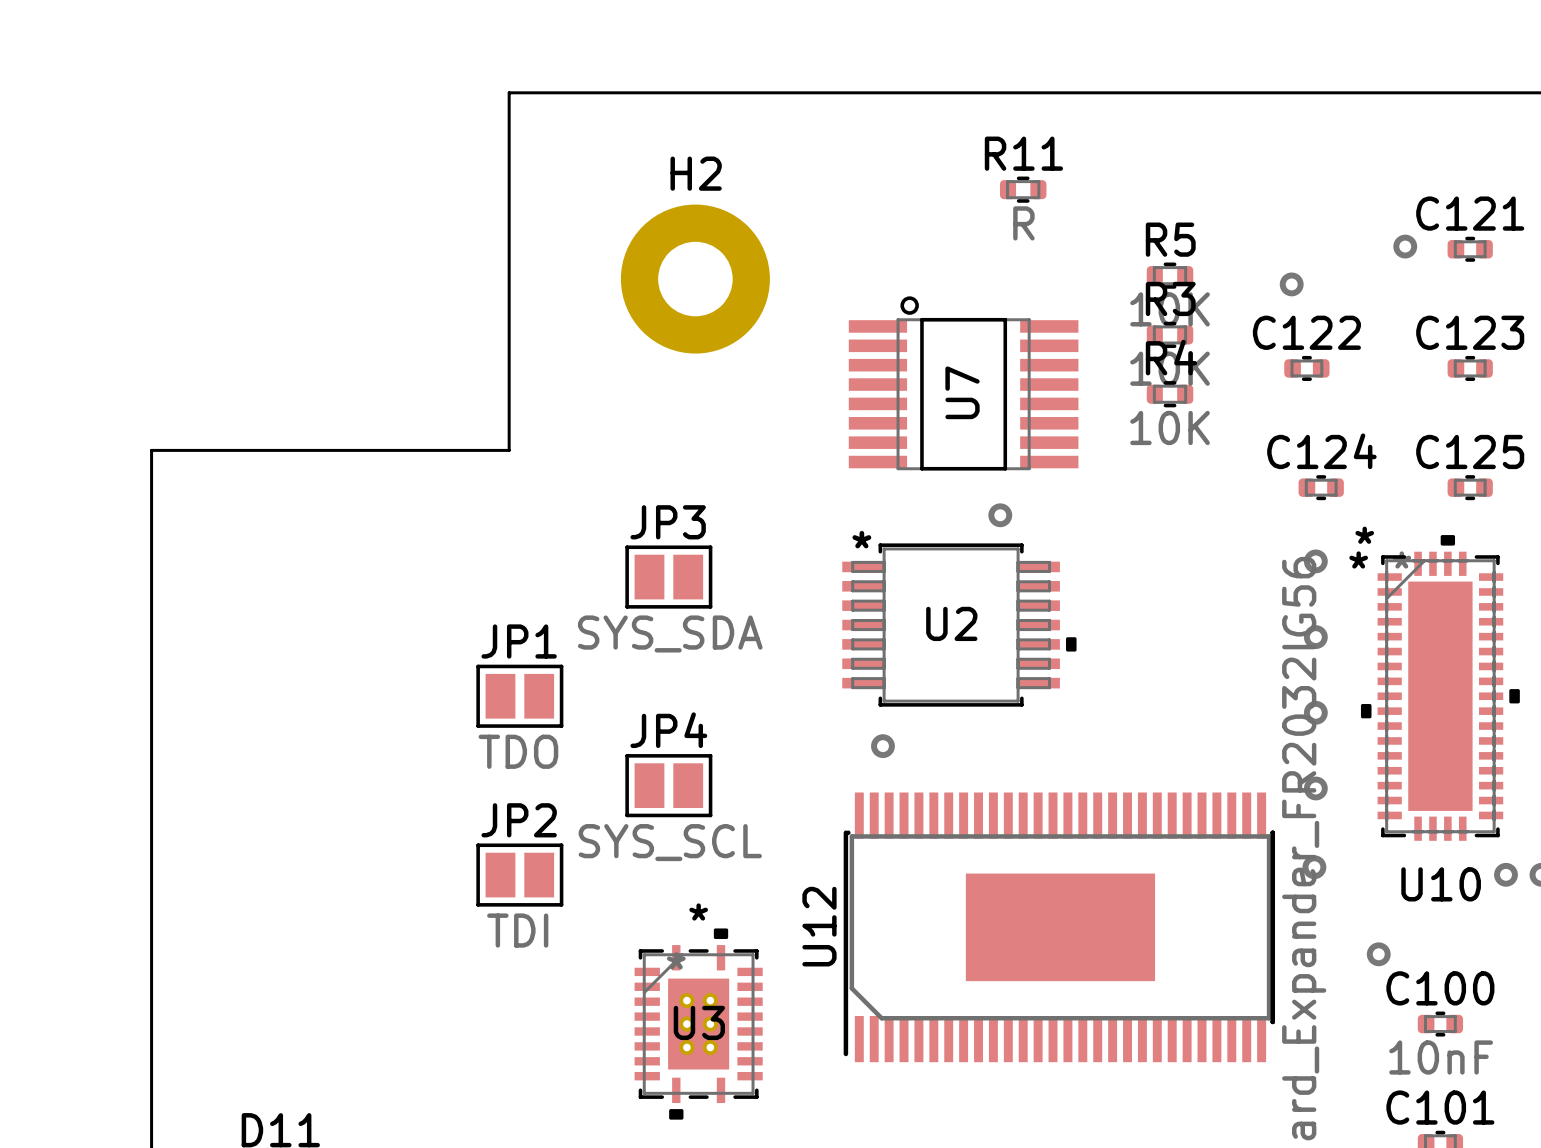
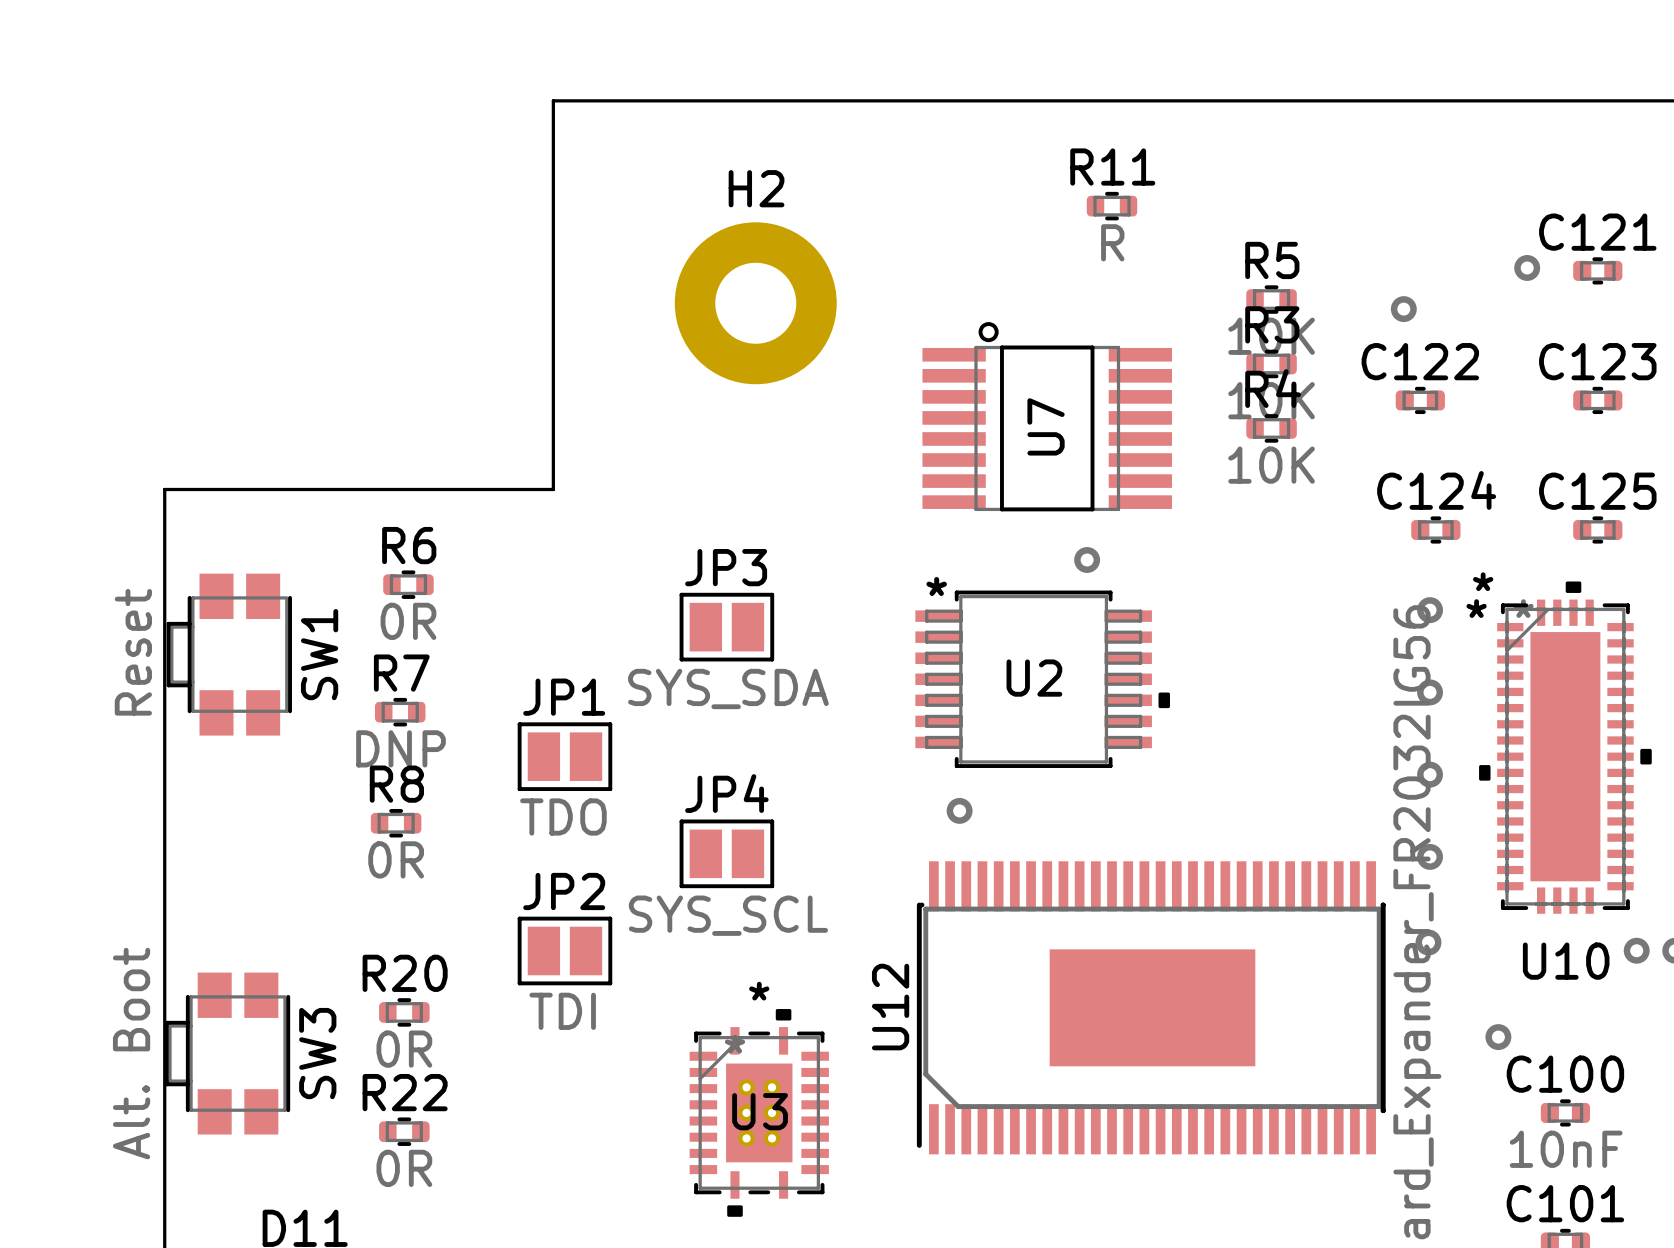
R6: none -> 0R (408, 584)
SW1: none -> Reset (229, 654)
R7: none -> DNP (400, 712)
R8: none -> 0R (396, 823)
R20: none -> 0R (404, 1012)
SW3: none -> Alt. Boot (227, 1053)
R22: none -> 0R (404, 1131)

